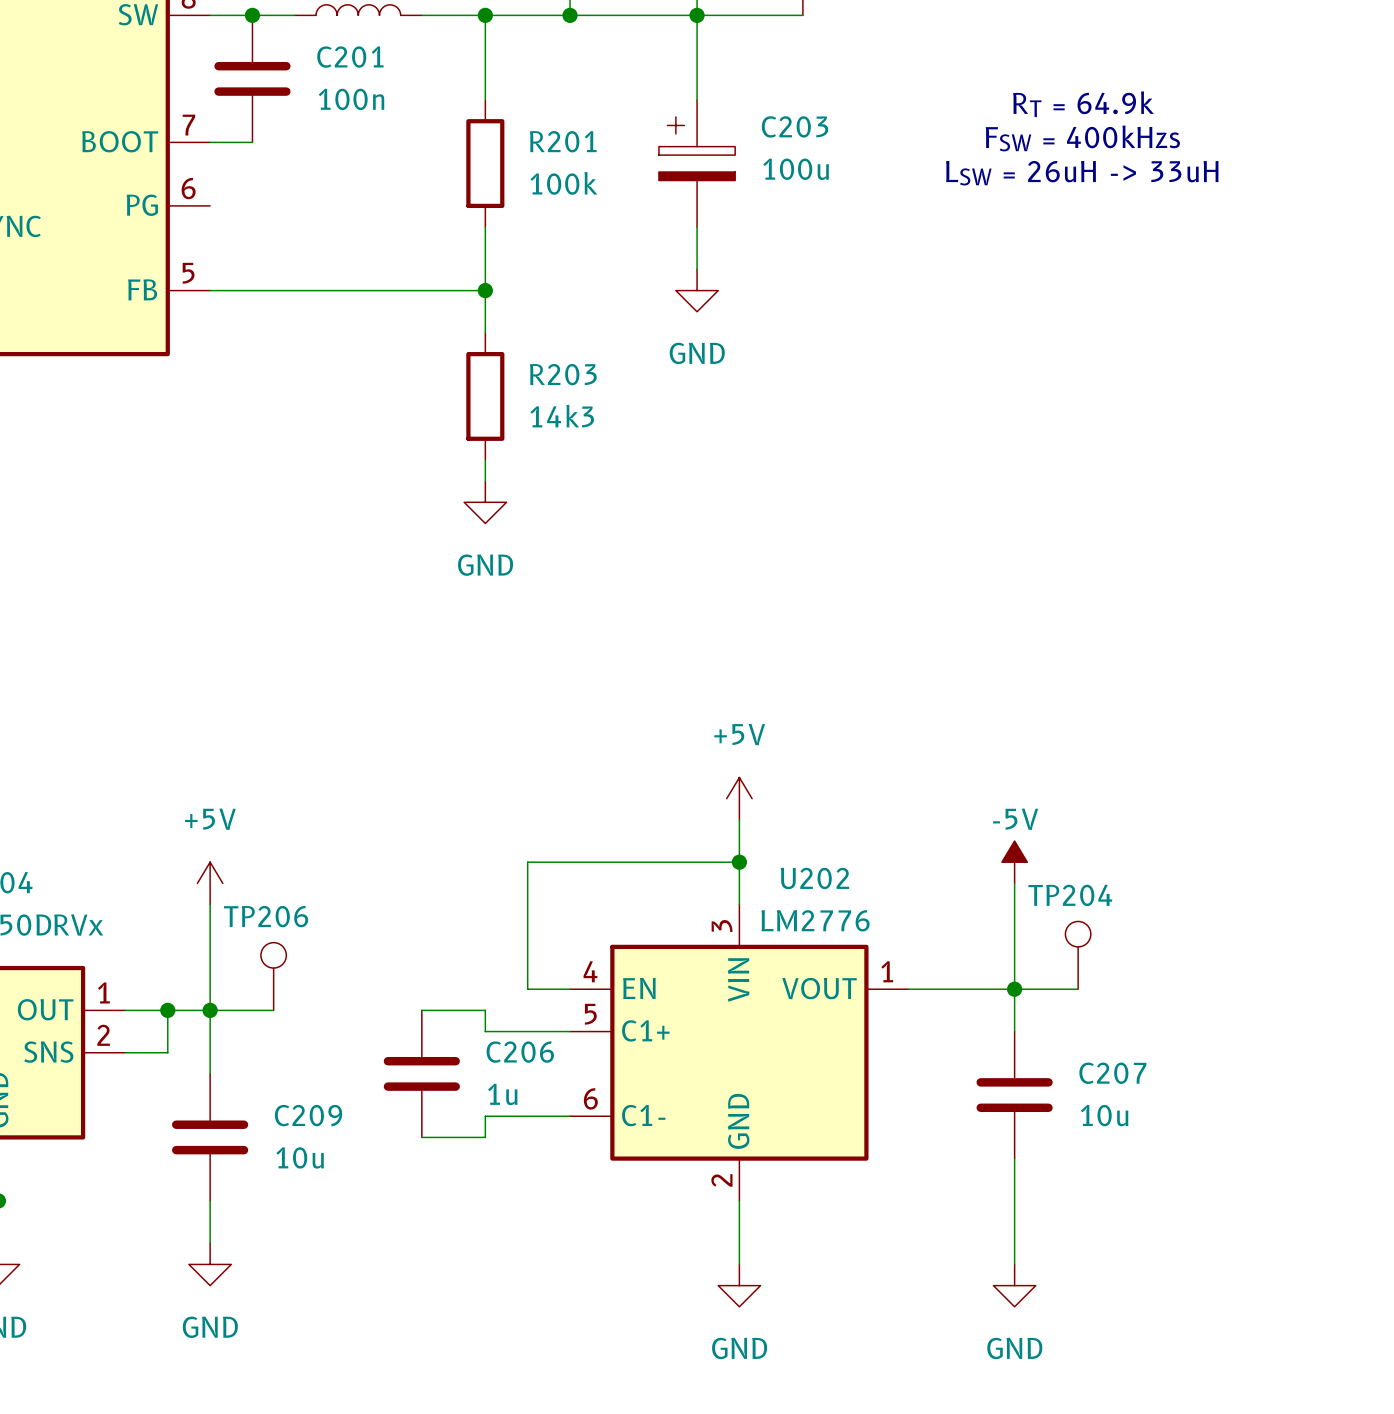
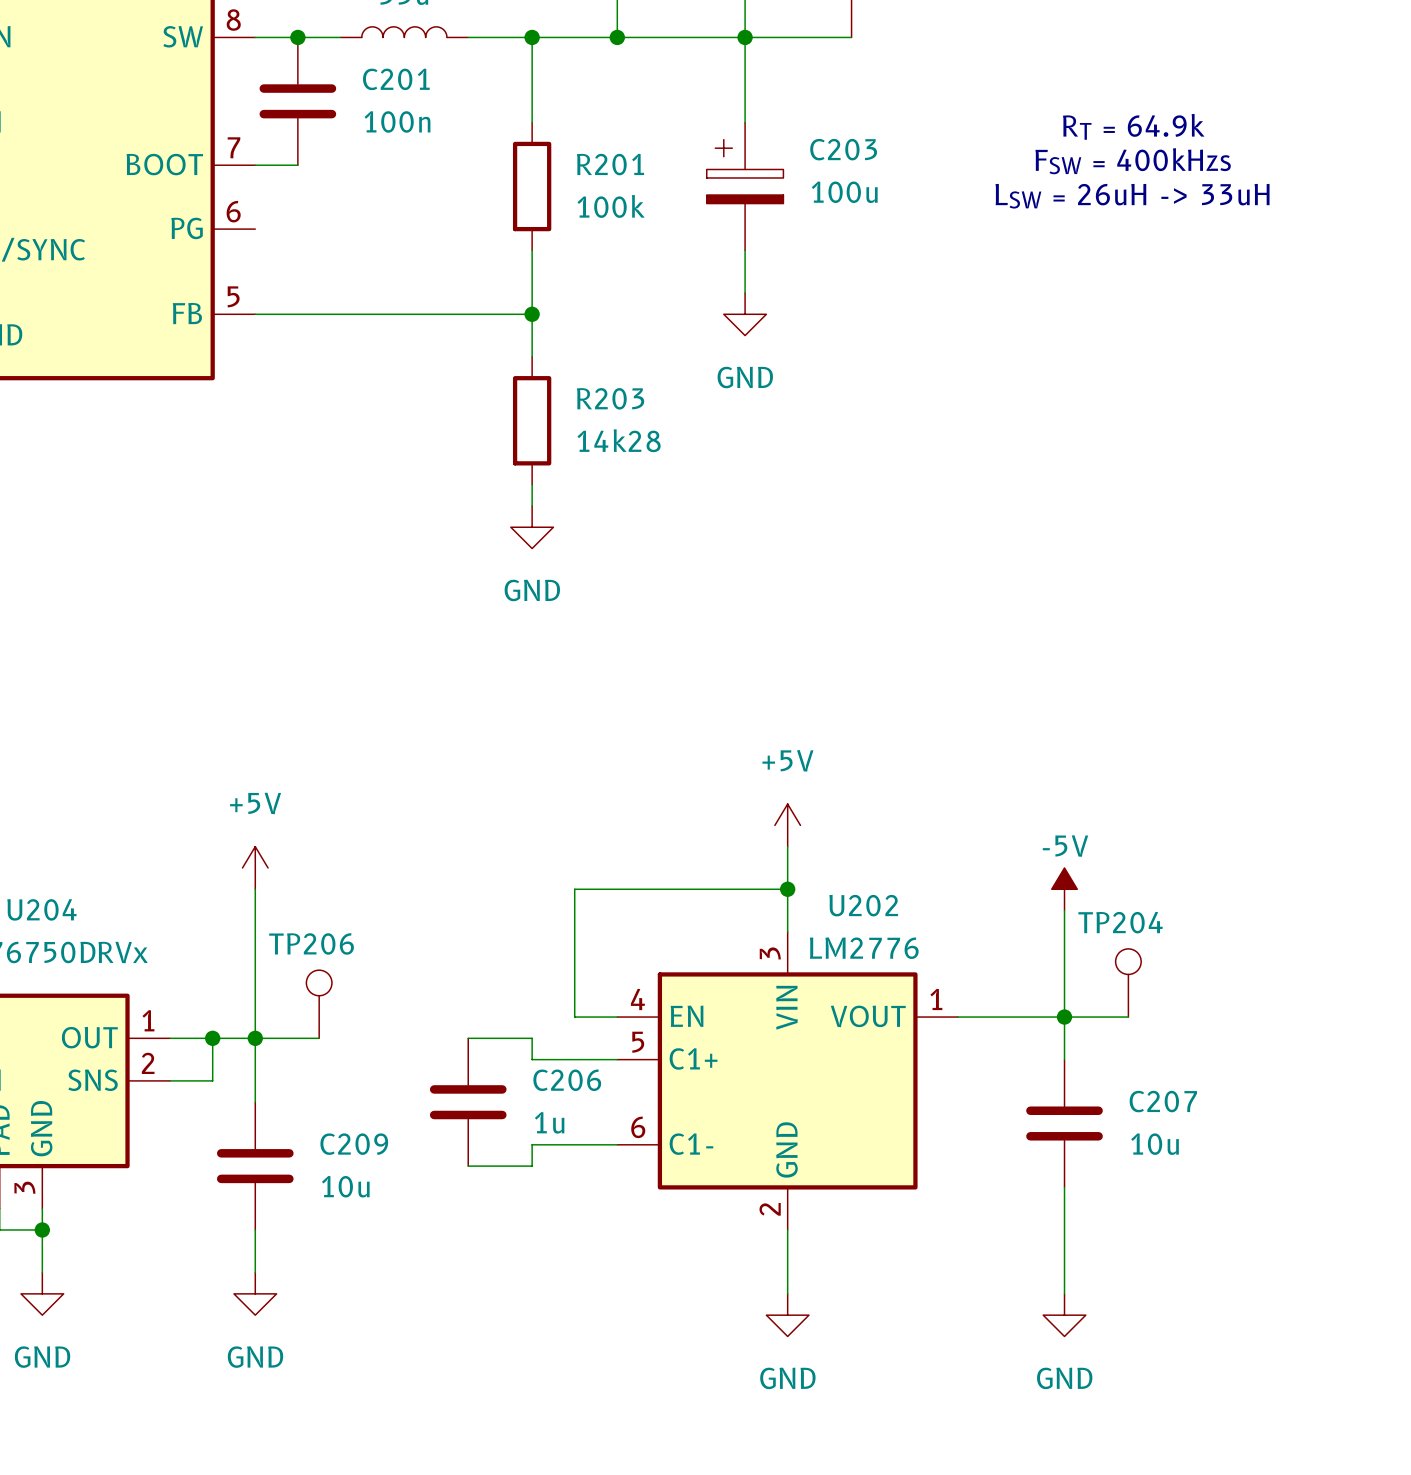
R203 value: 14k3 (562, 416) -> 14k28 (619, 440)
power symbol position: +5V (210, 883) -> +5V (255, 867)

